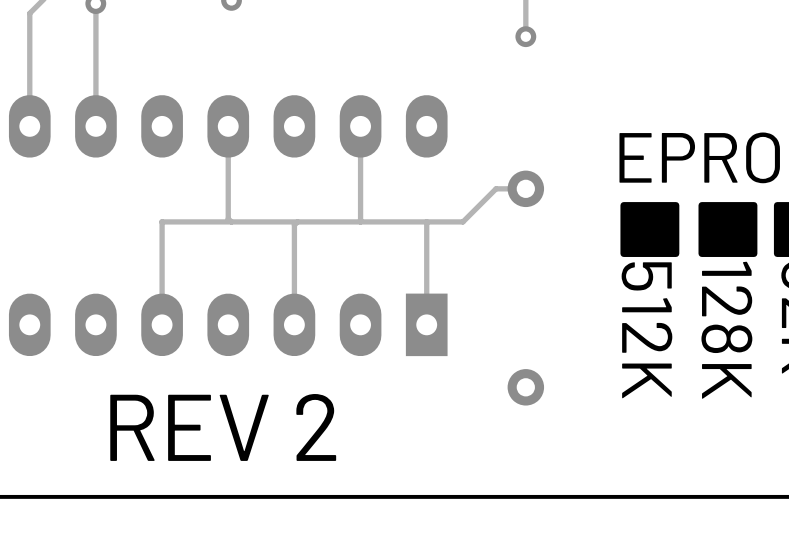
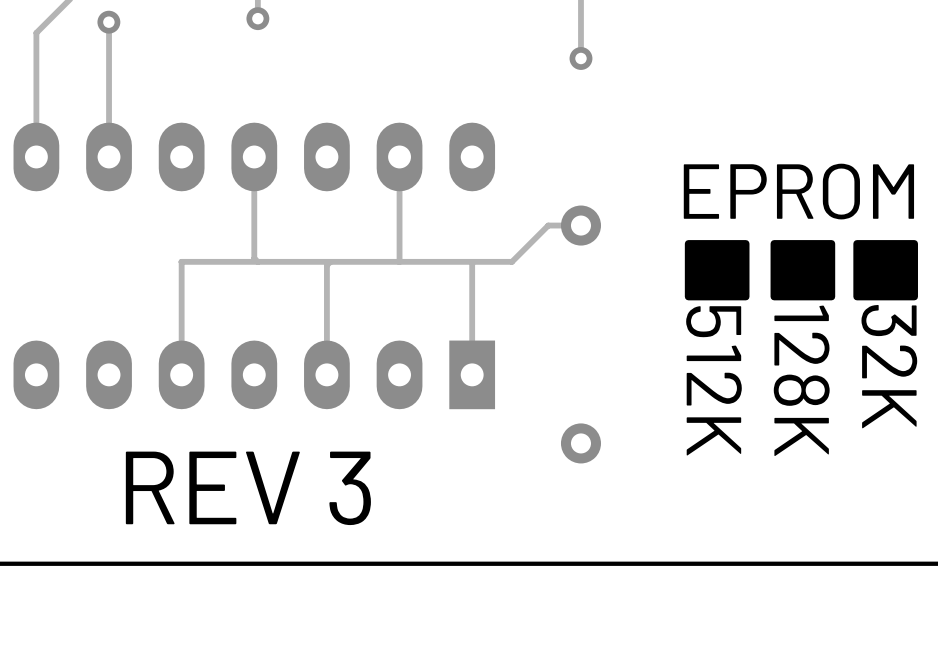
text: REV 2 (223, 427) -> REV 3 (248, 488)

